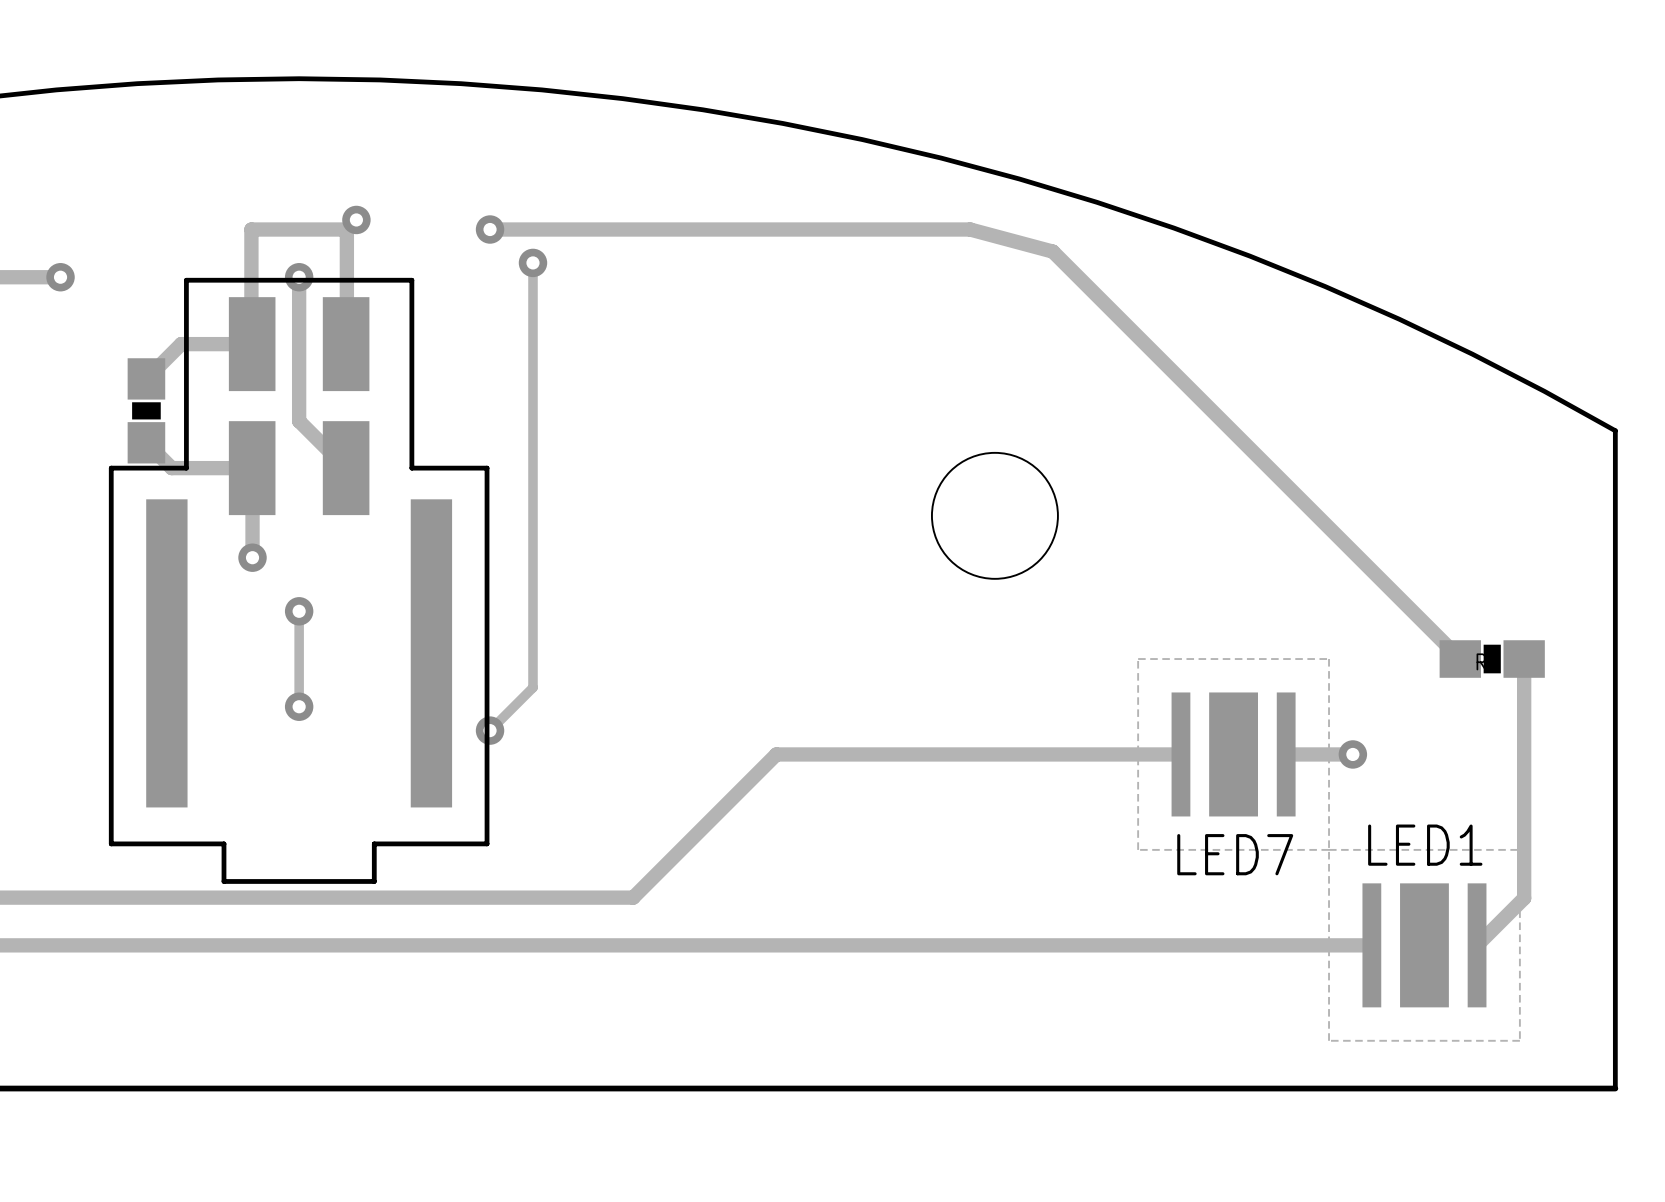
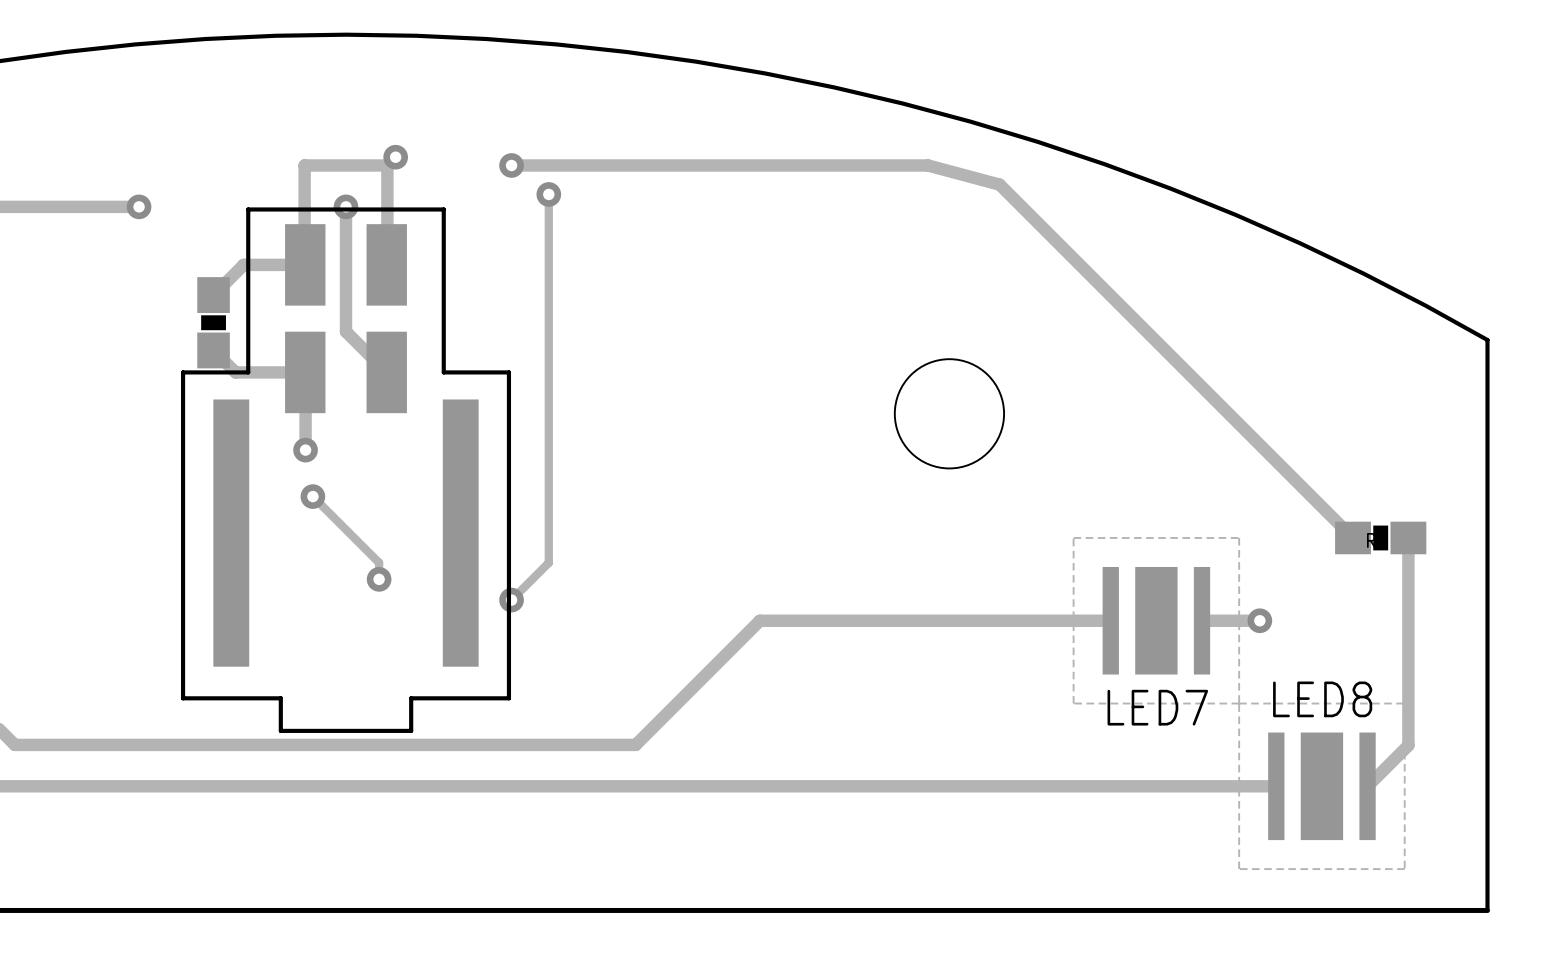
track: none -> (312, 496) (379, 562) (379, 579)
track: (299, 611) (299, 706) -> none
via position: (299, 611) -> (312, 496)
via position: (299, 706) -> (379, 579)
LED1 name: LED1 (1425, 845) -> LED8 (1322, 699)

